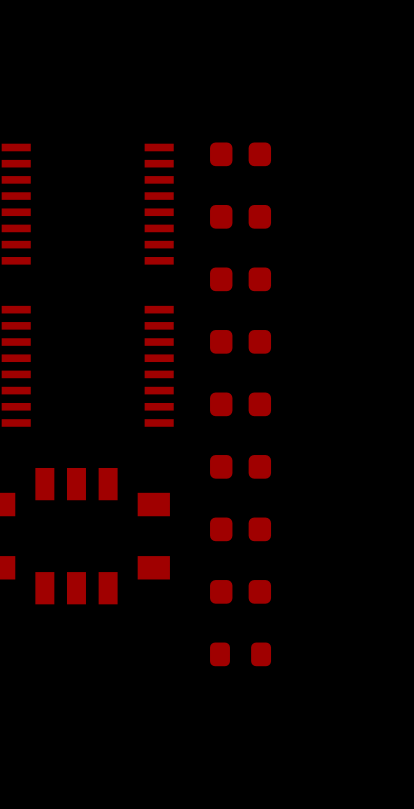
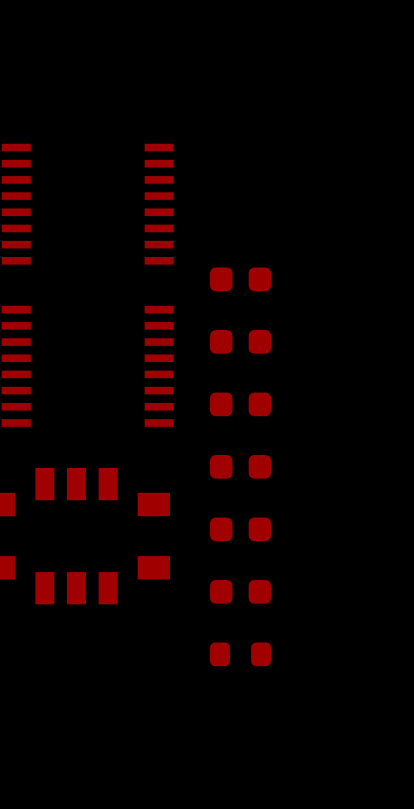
part: (240, 154) -> none
part: (240, 216) -> none

